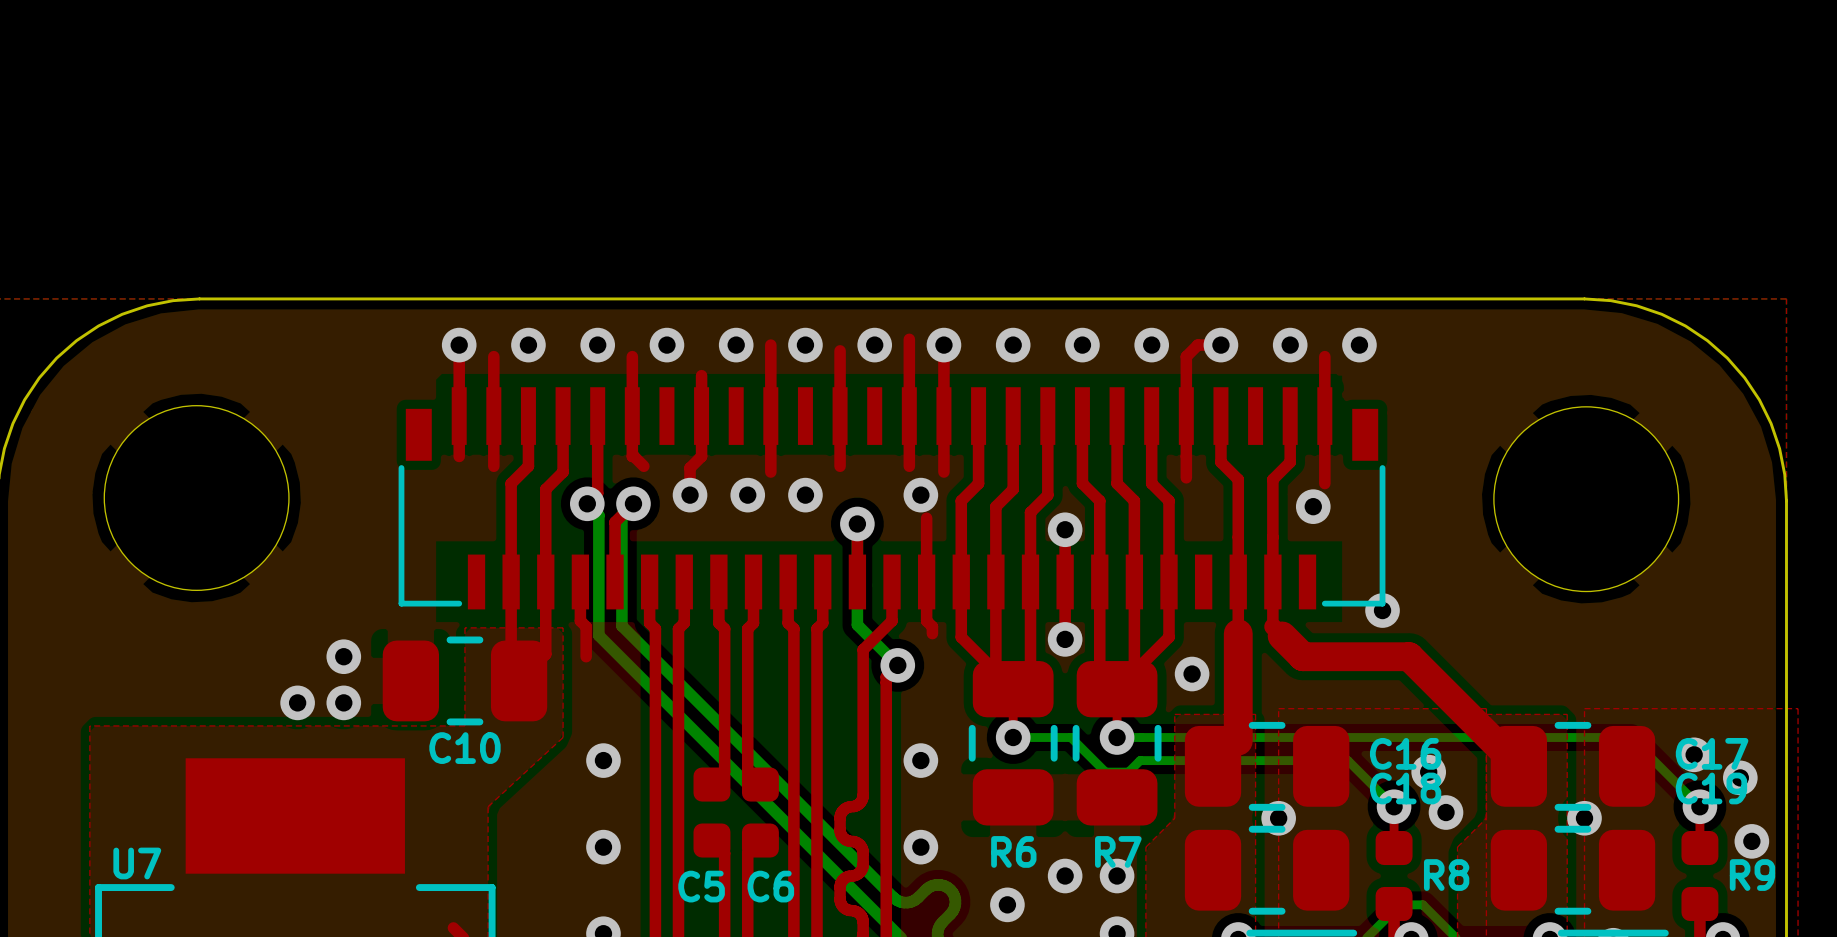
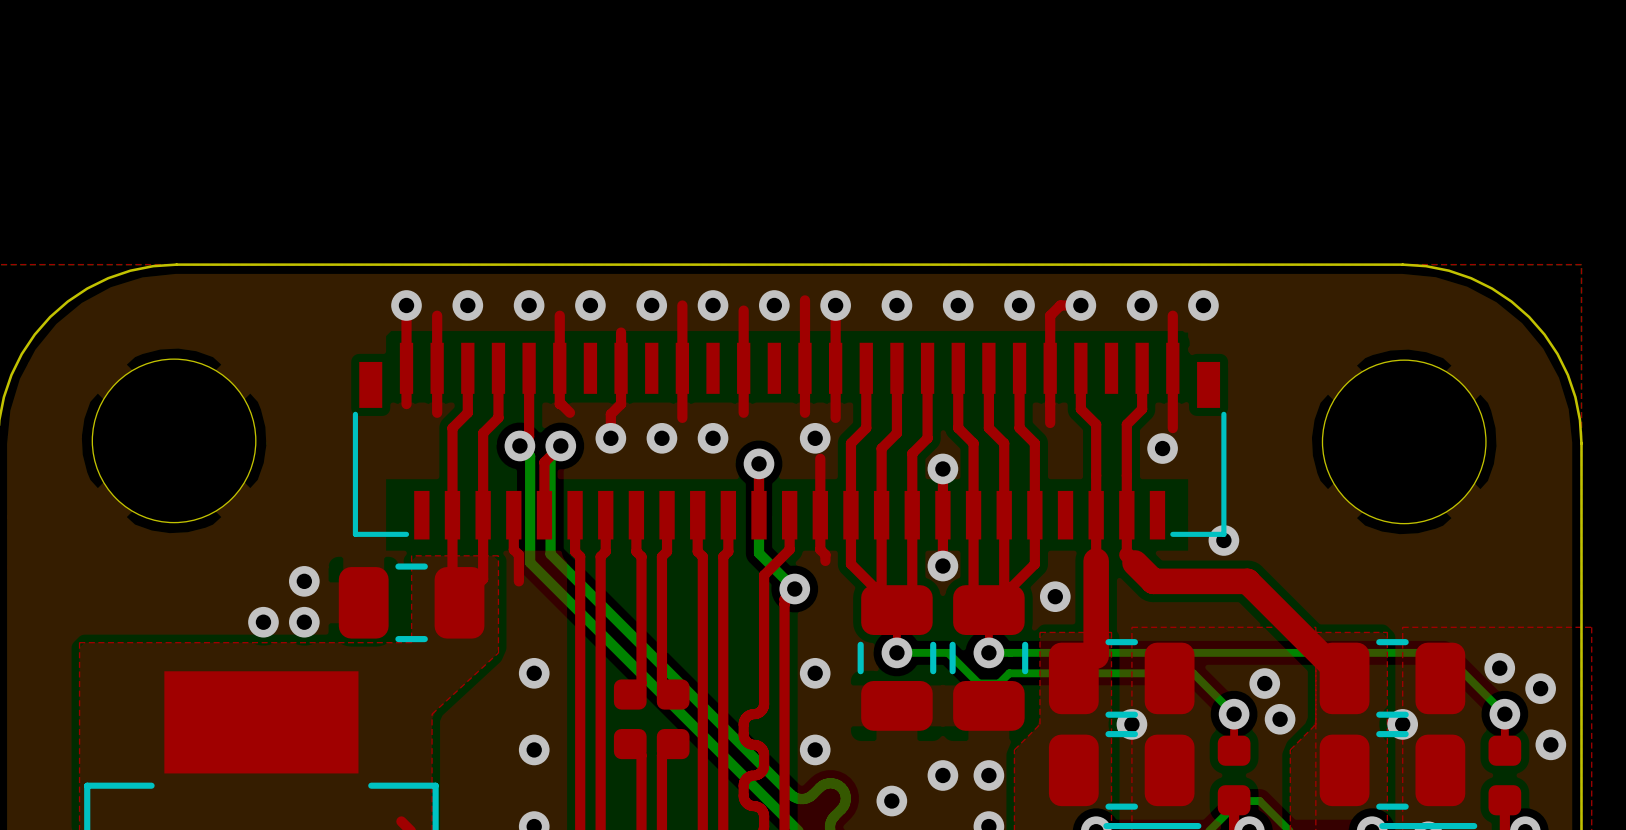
C10 name: C10 (464, 748) -> none
C16 name: C16 (1405, 753) -> none
C17 name: C17 (1712, 753) -> none
C18 name: C18 (1405, 788) -> none
C19 name: C19 (1711, 788) -> none
R6 name: R6 (1013, 851) -> none
R7 name: R7 (1118, 851) -> none
U7 name: U7 (137, 863) -> none
R8 name: R8 (1446, 875) -> none
R9 name: R9 (1752, 875) -> none
C5 name: C5 (701, 886) -> none
C6 name: C6 (770, 886) -> none

